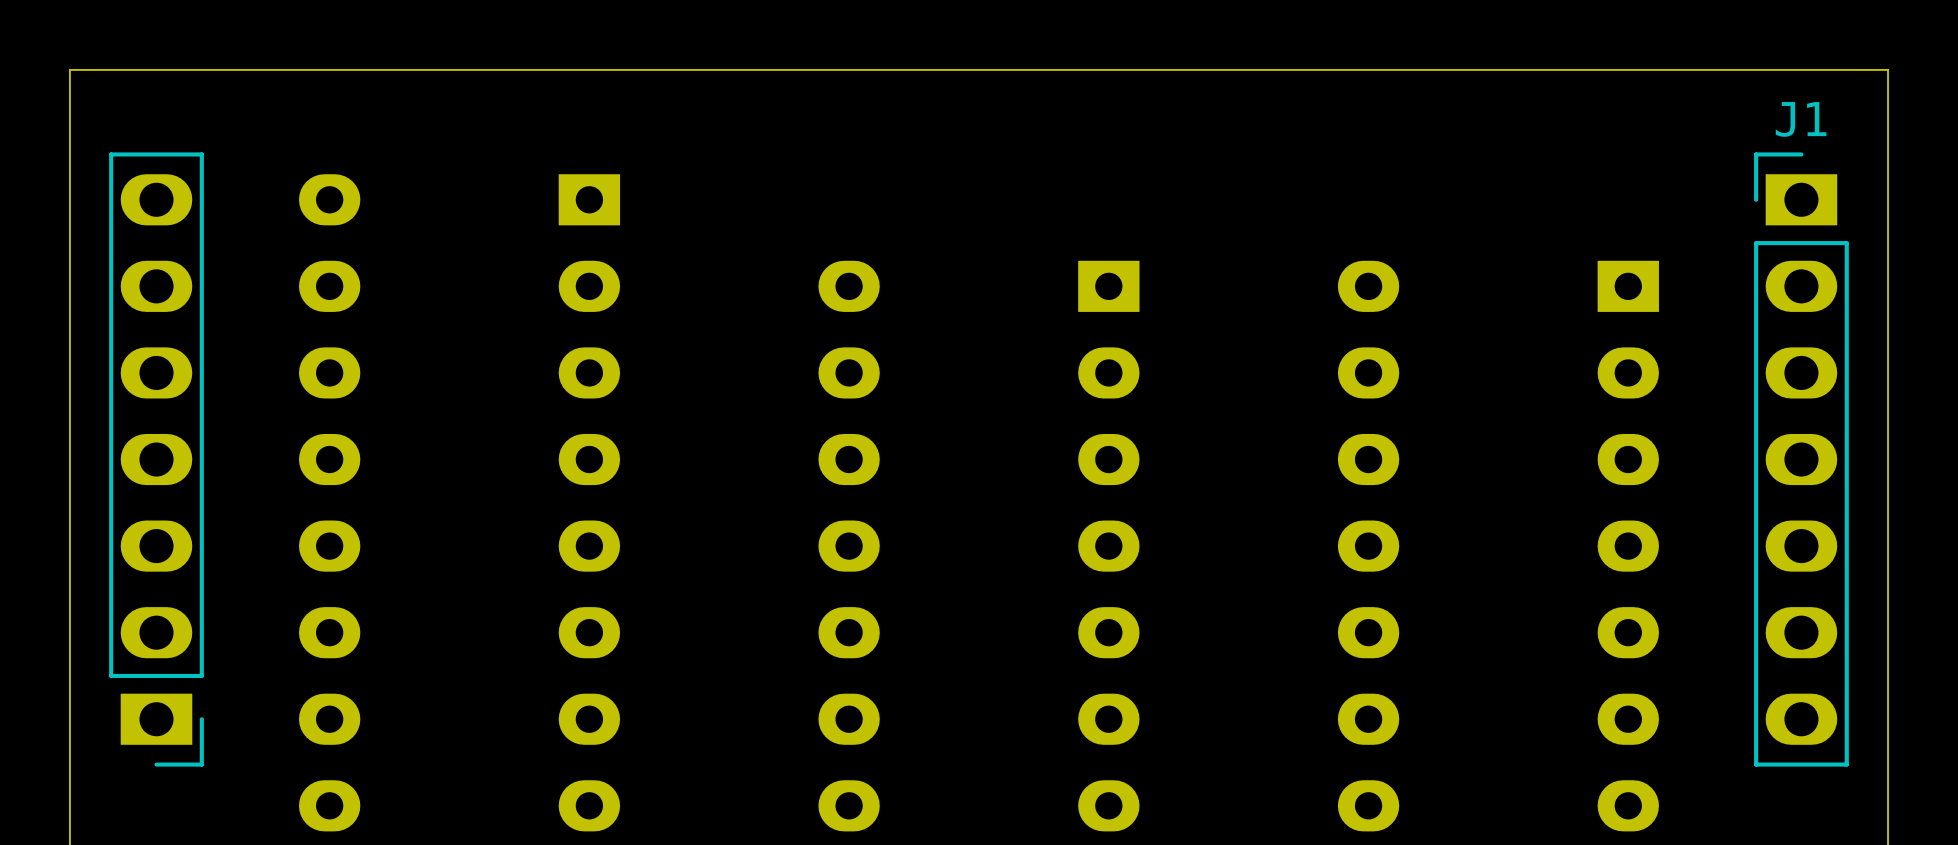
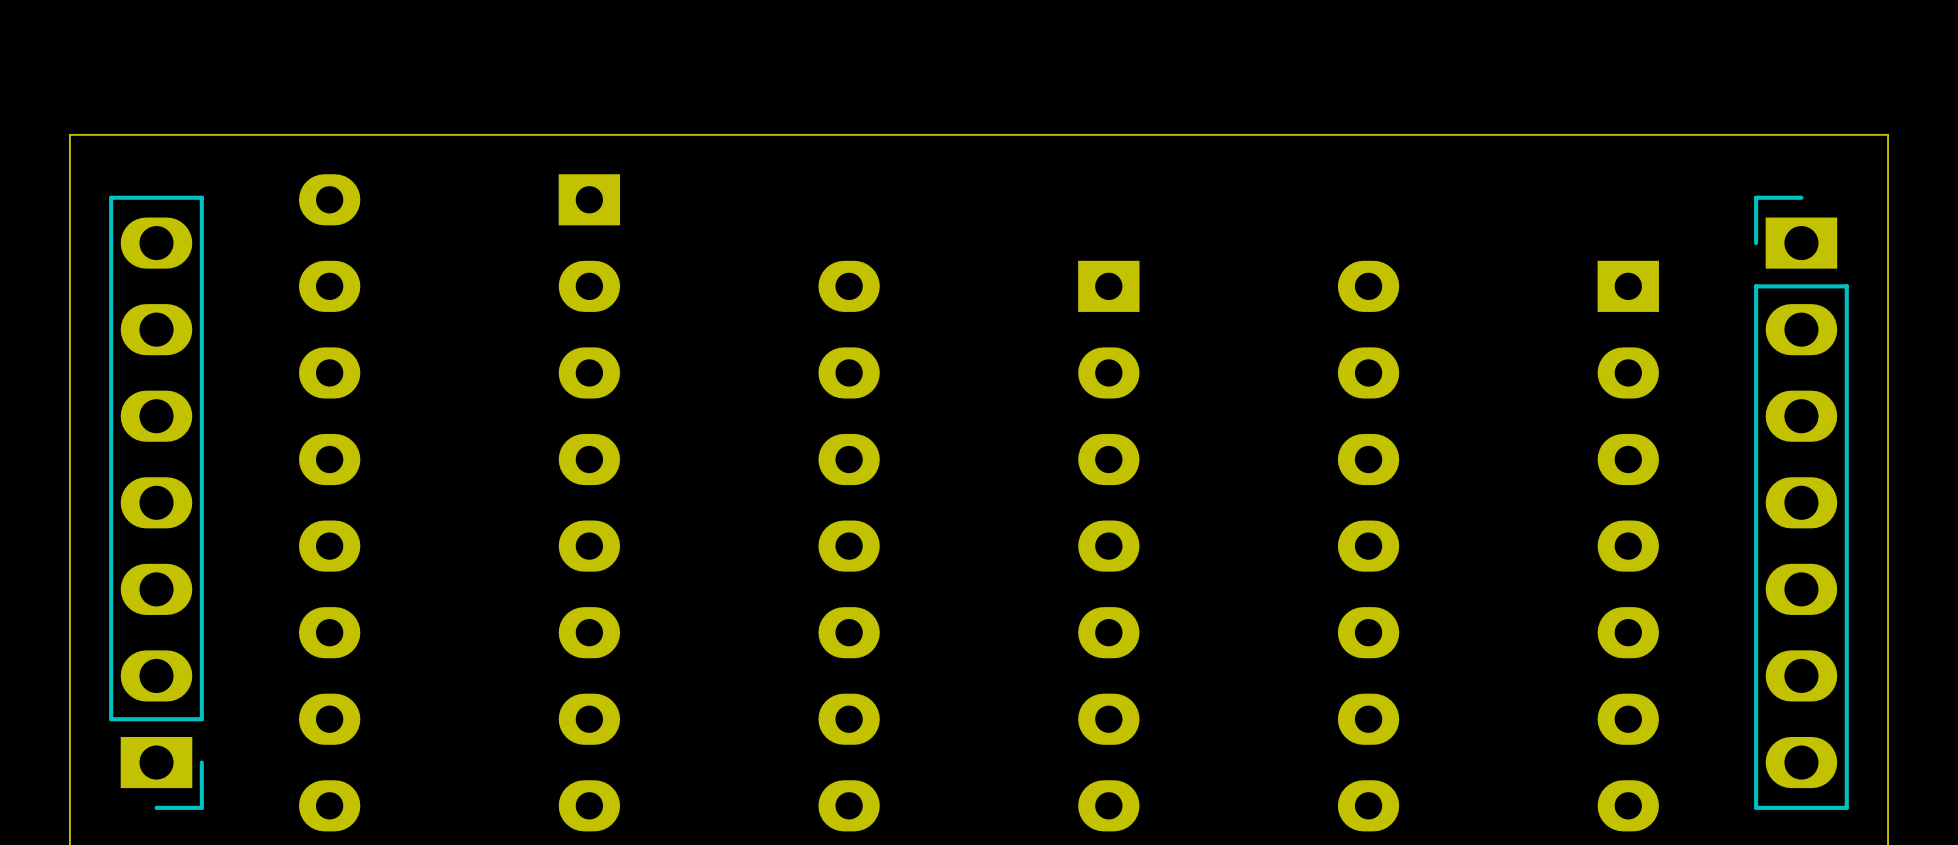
board edge: (1888, 134) (1888, 69) (69, 69) (69, 134) -> (1888, 134) (69, 134)
part position: (156, 459) -> (156, 502)
J1: (1801, 459) -> none
part: none -> (1801, 502)

